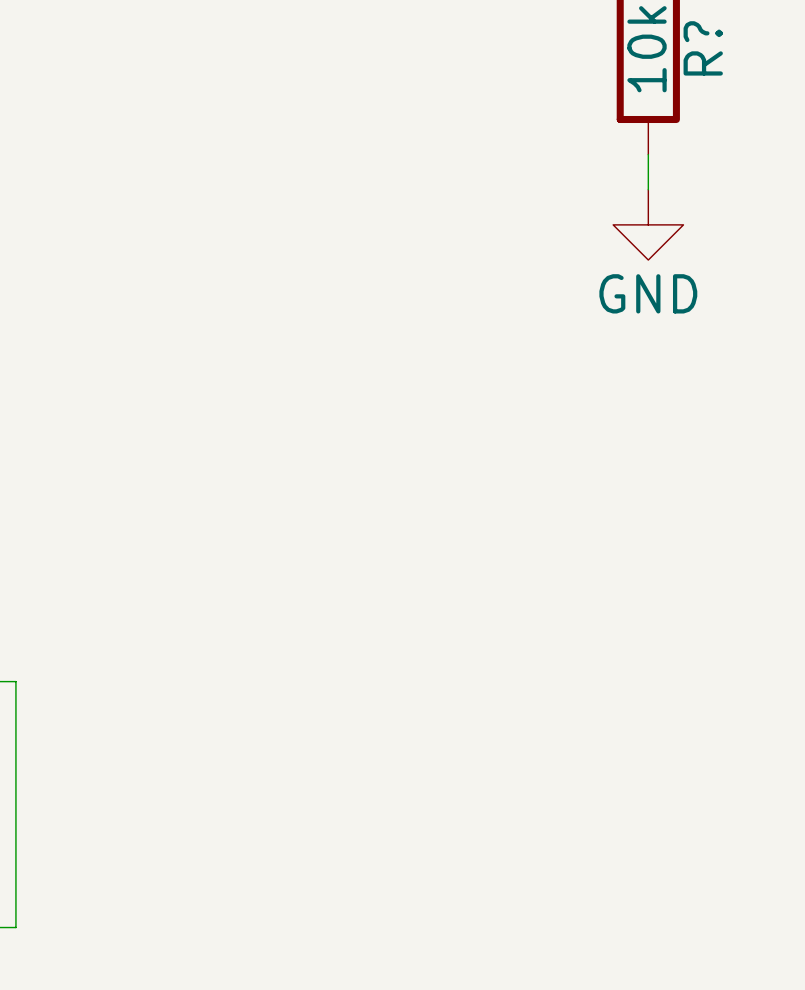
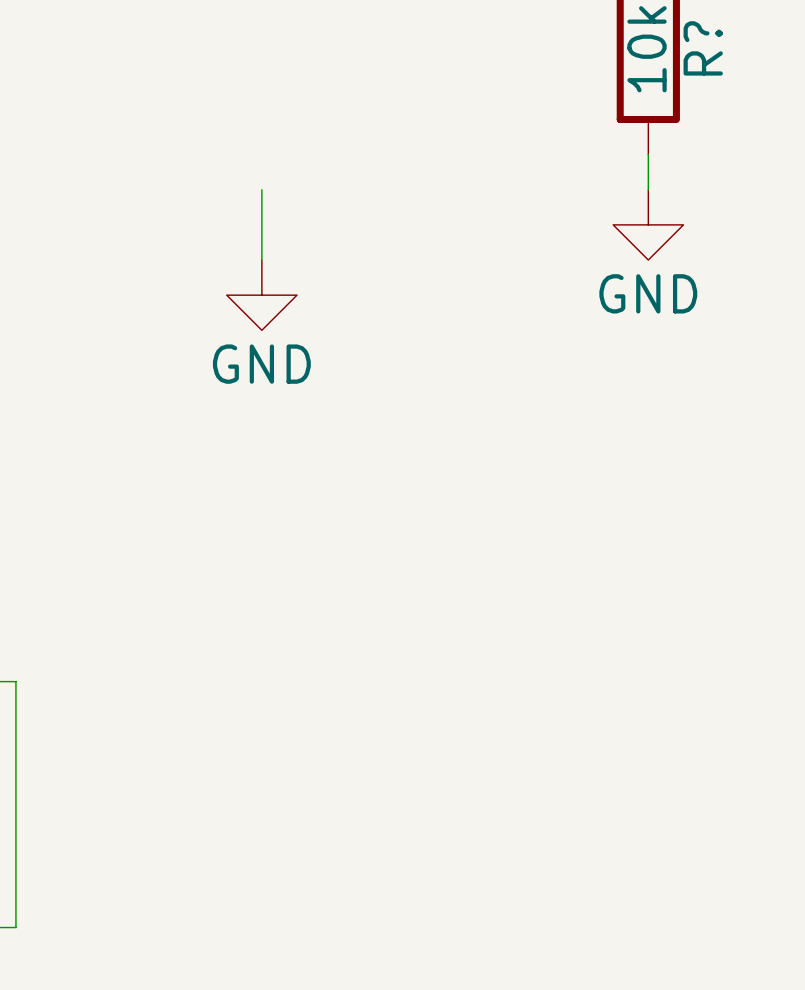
wire: none -> (261, 189) (261, 260)
power symbol: none -> GND (261, 295)

